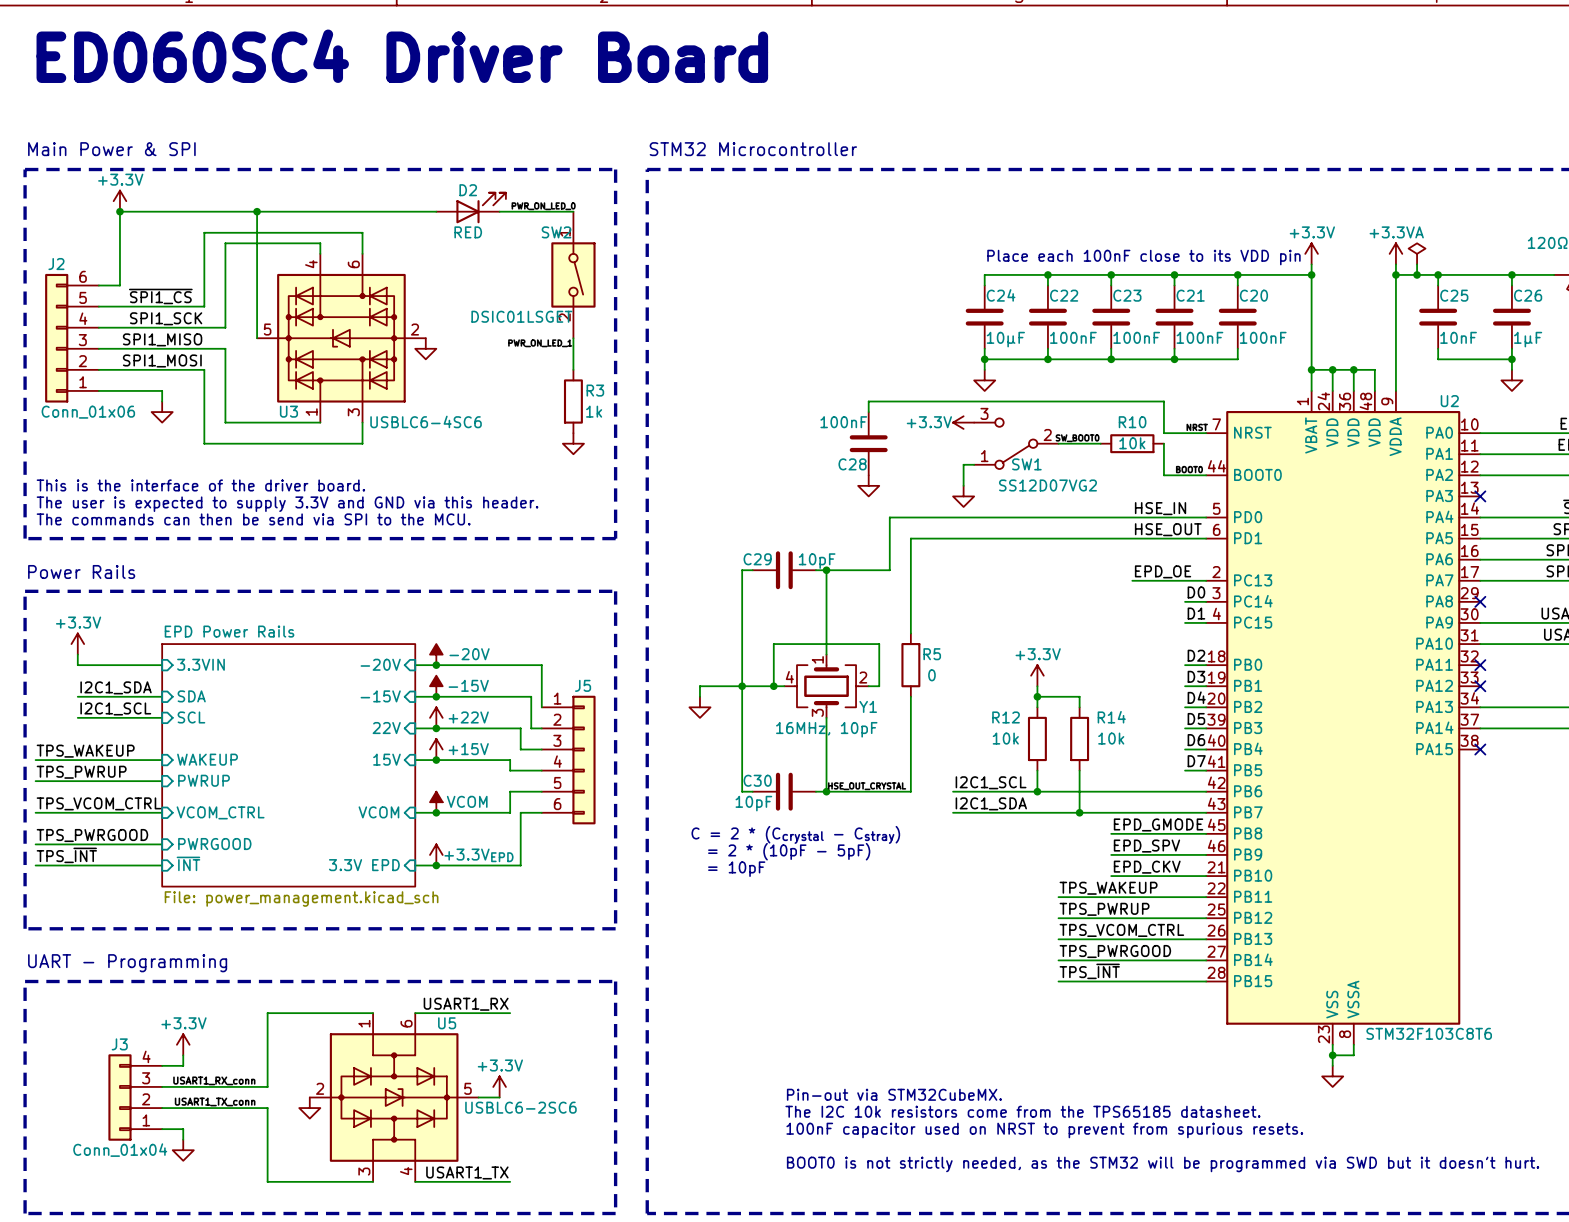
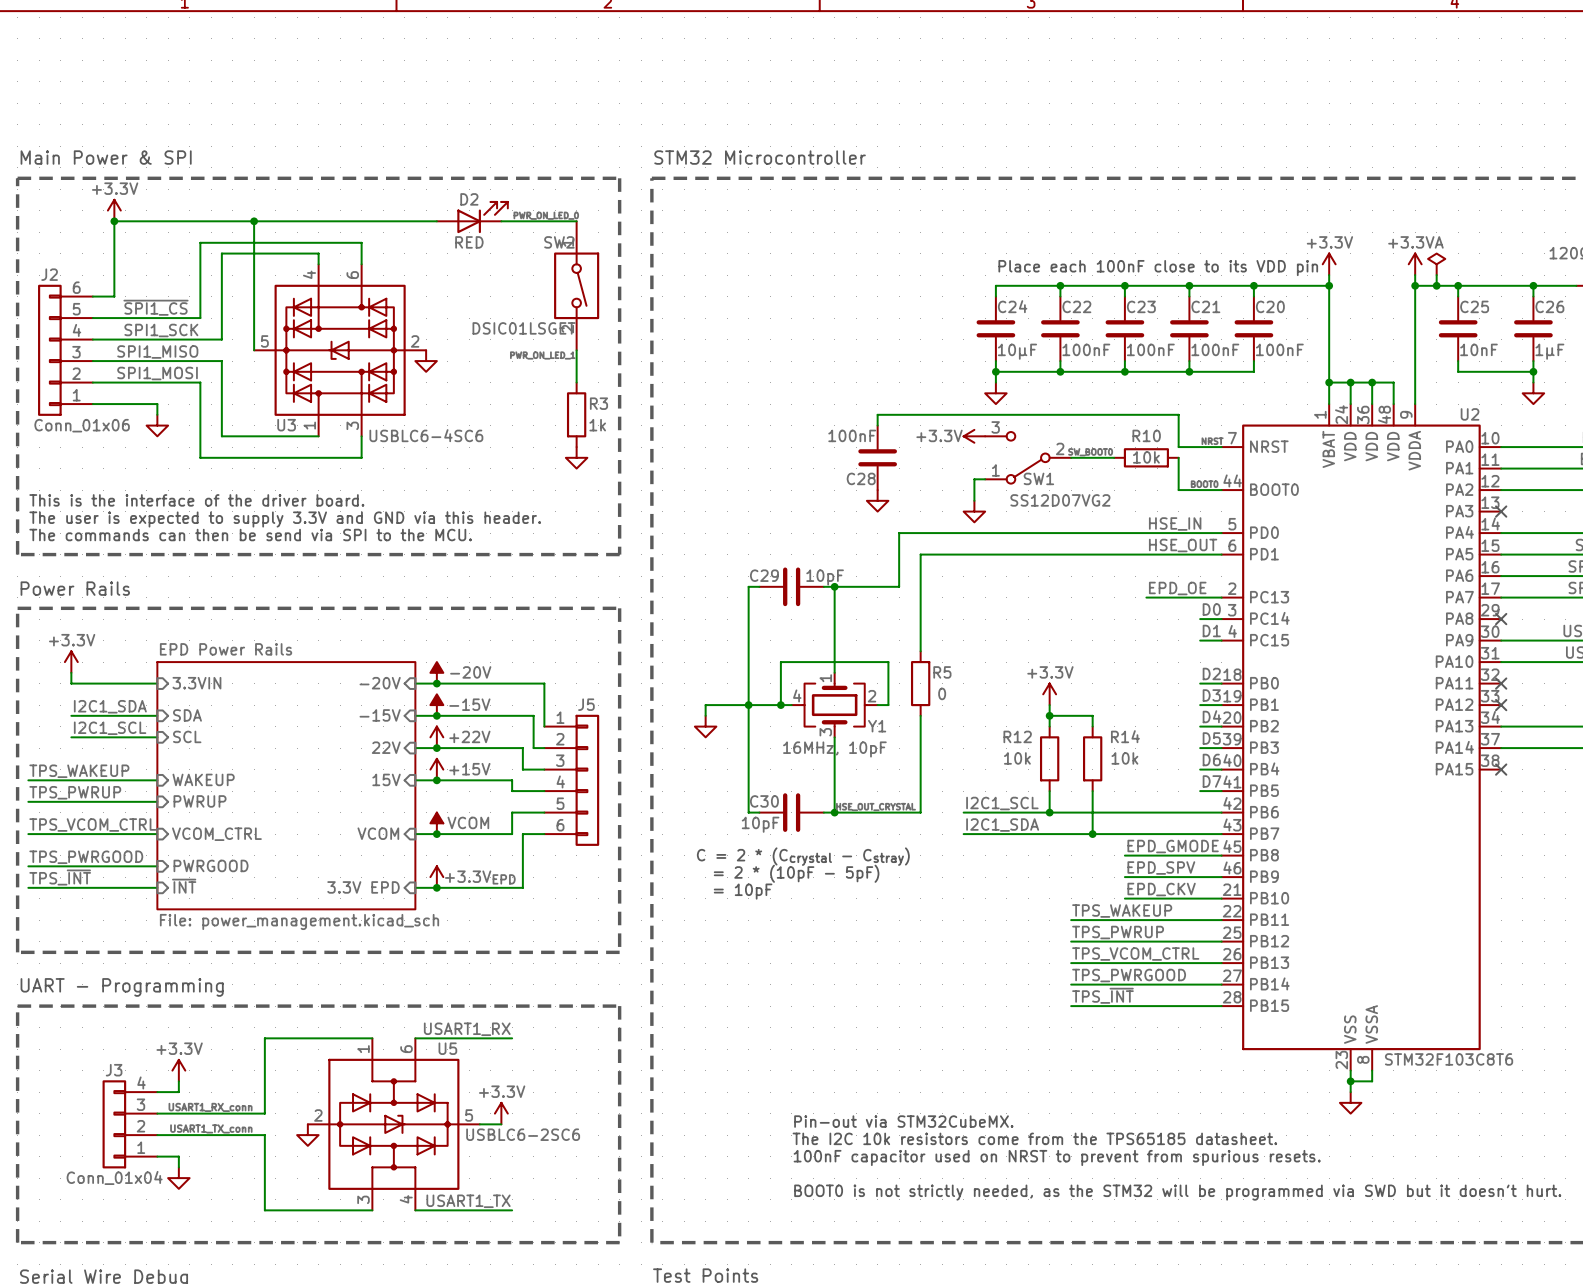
text: ED060SC4 Driver Board (402, 56) -> none

